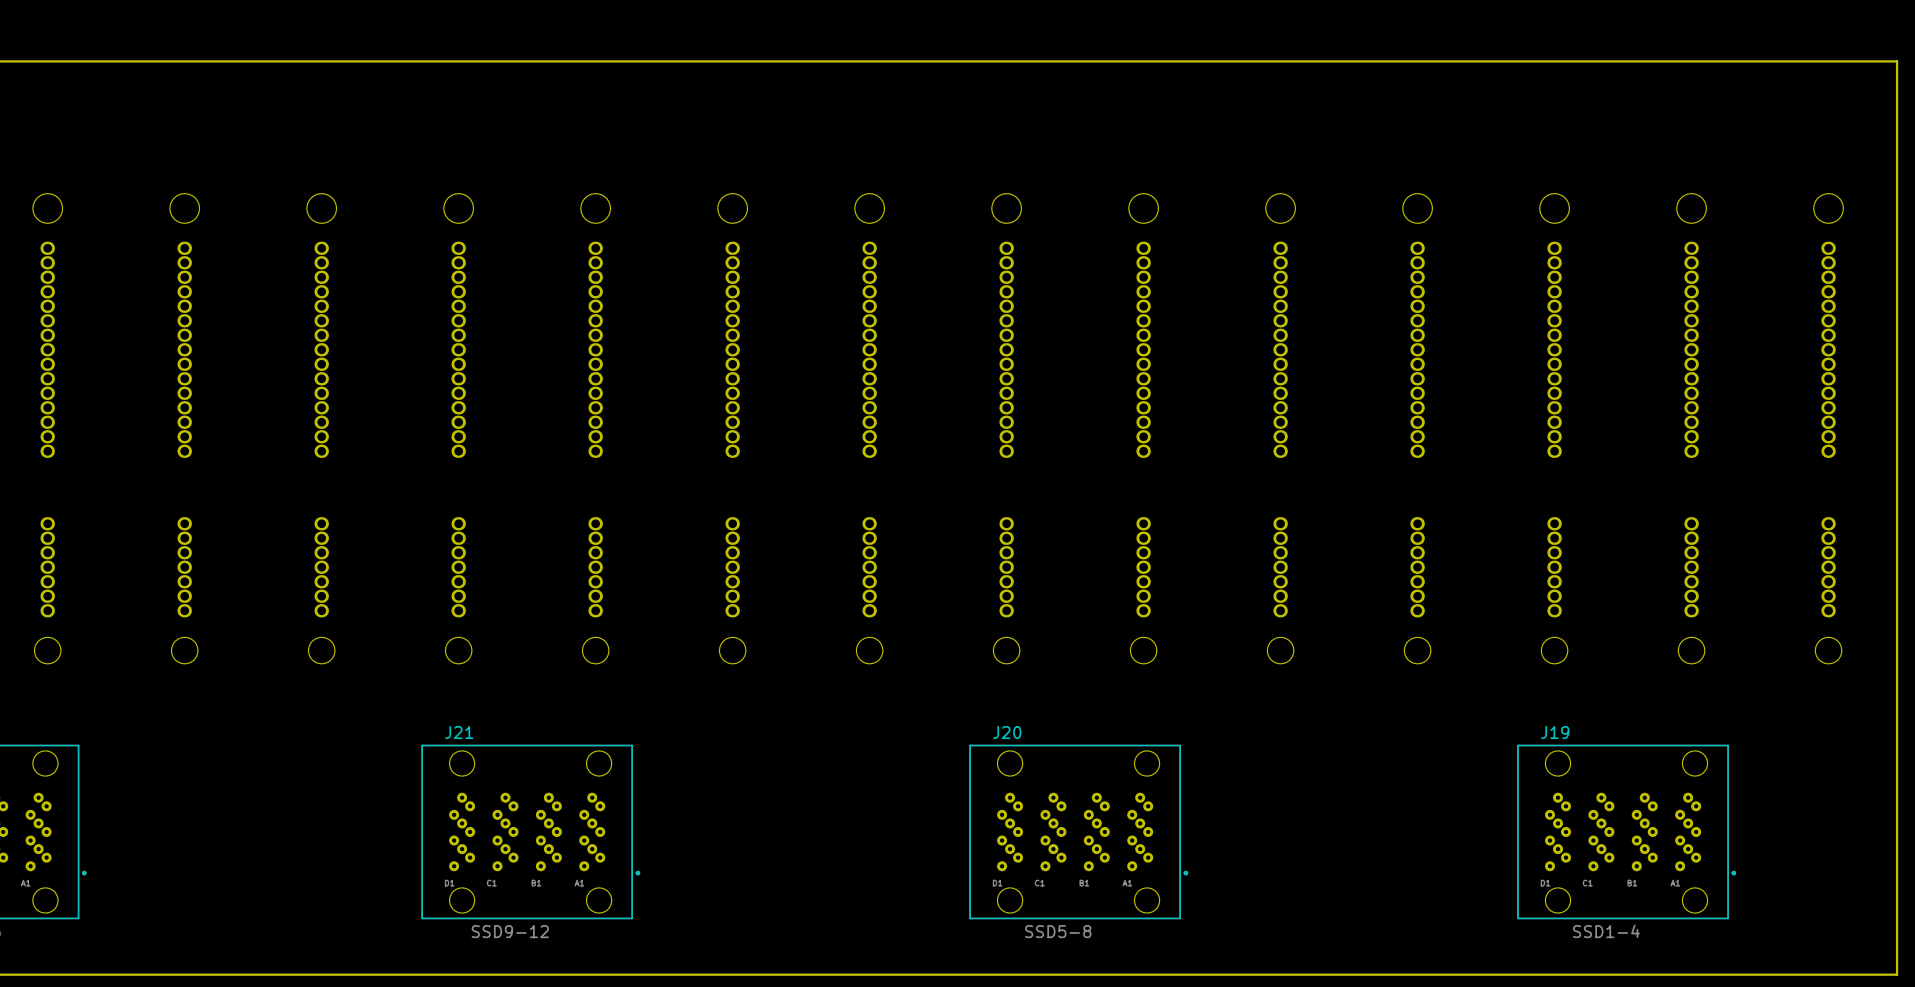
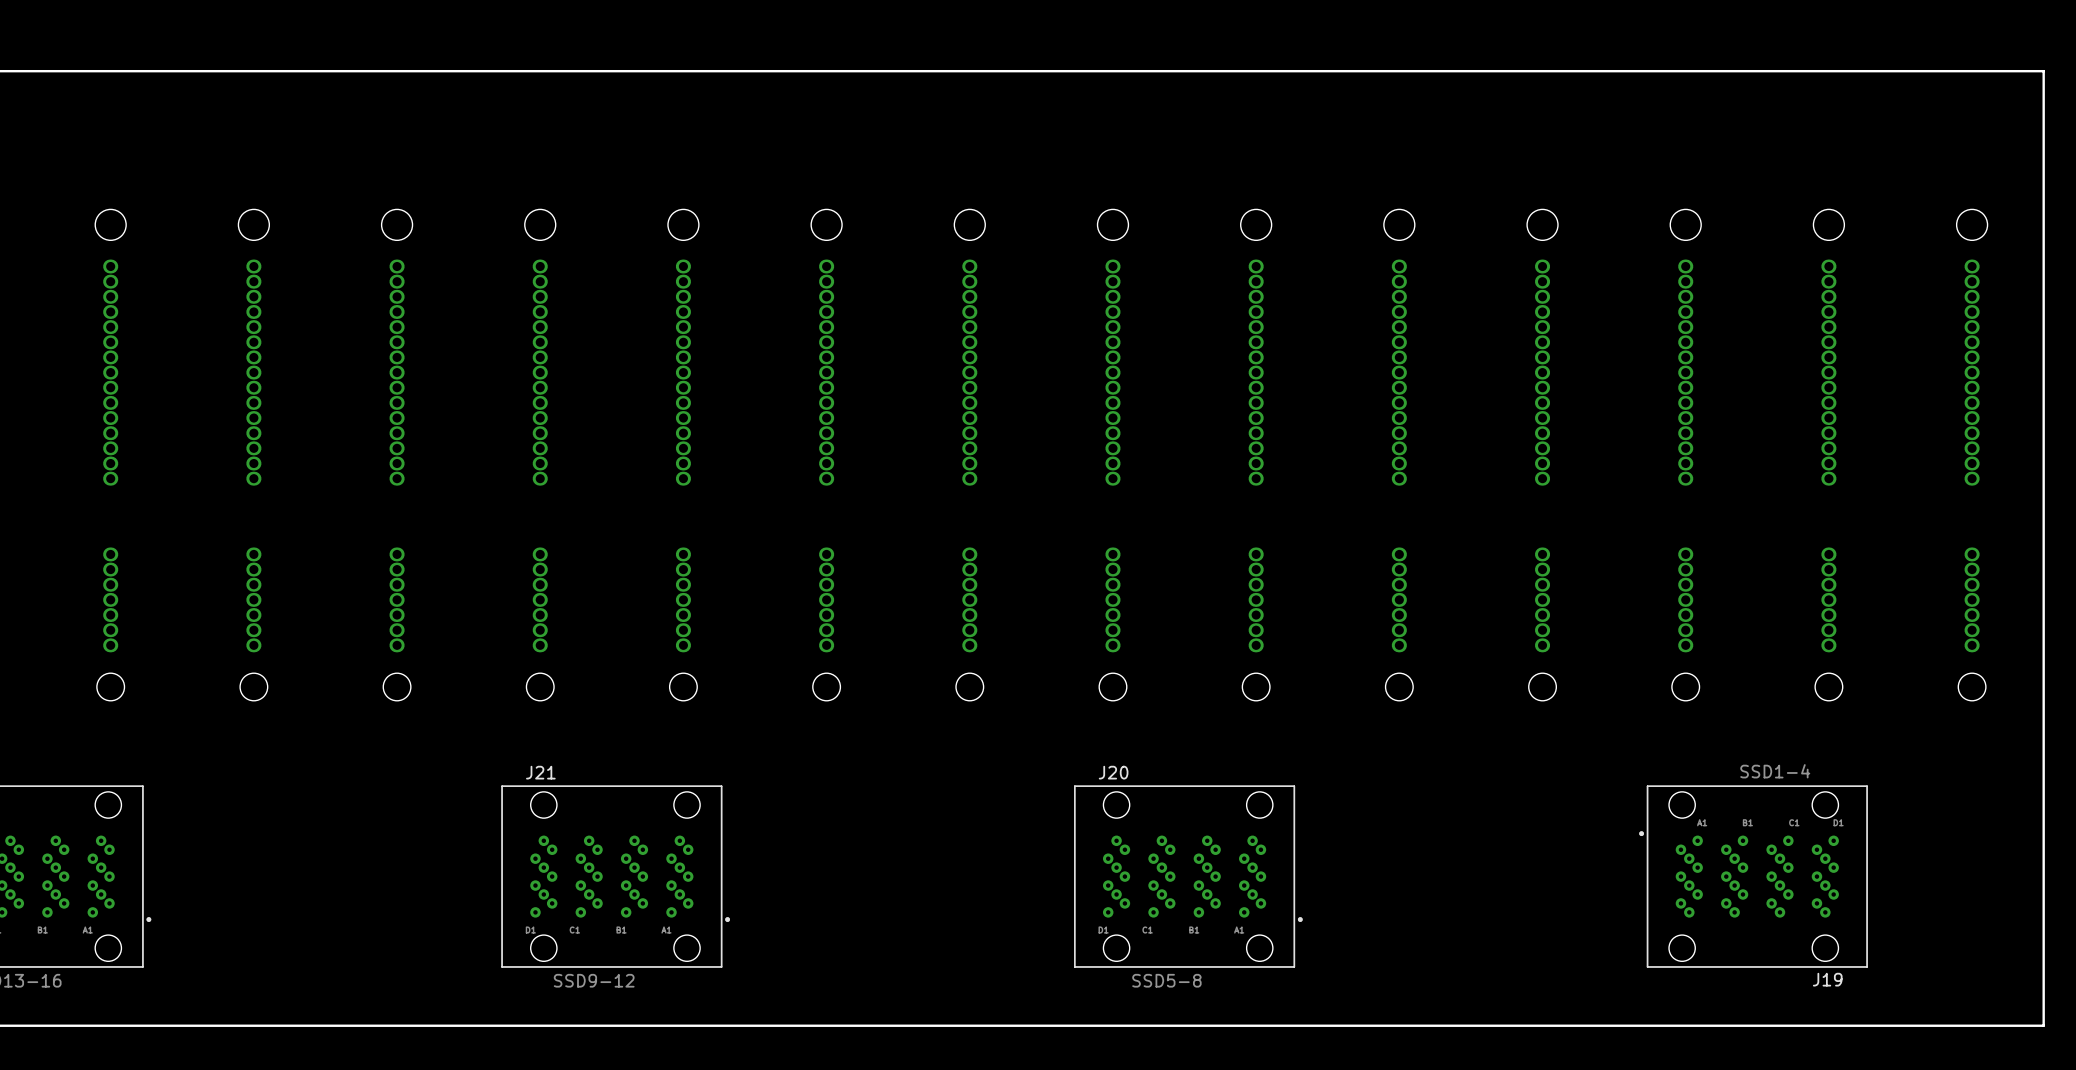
J19 rotation: 0° (1626, 831) -> 180° (1753, 876)

